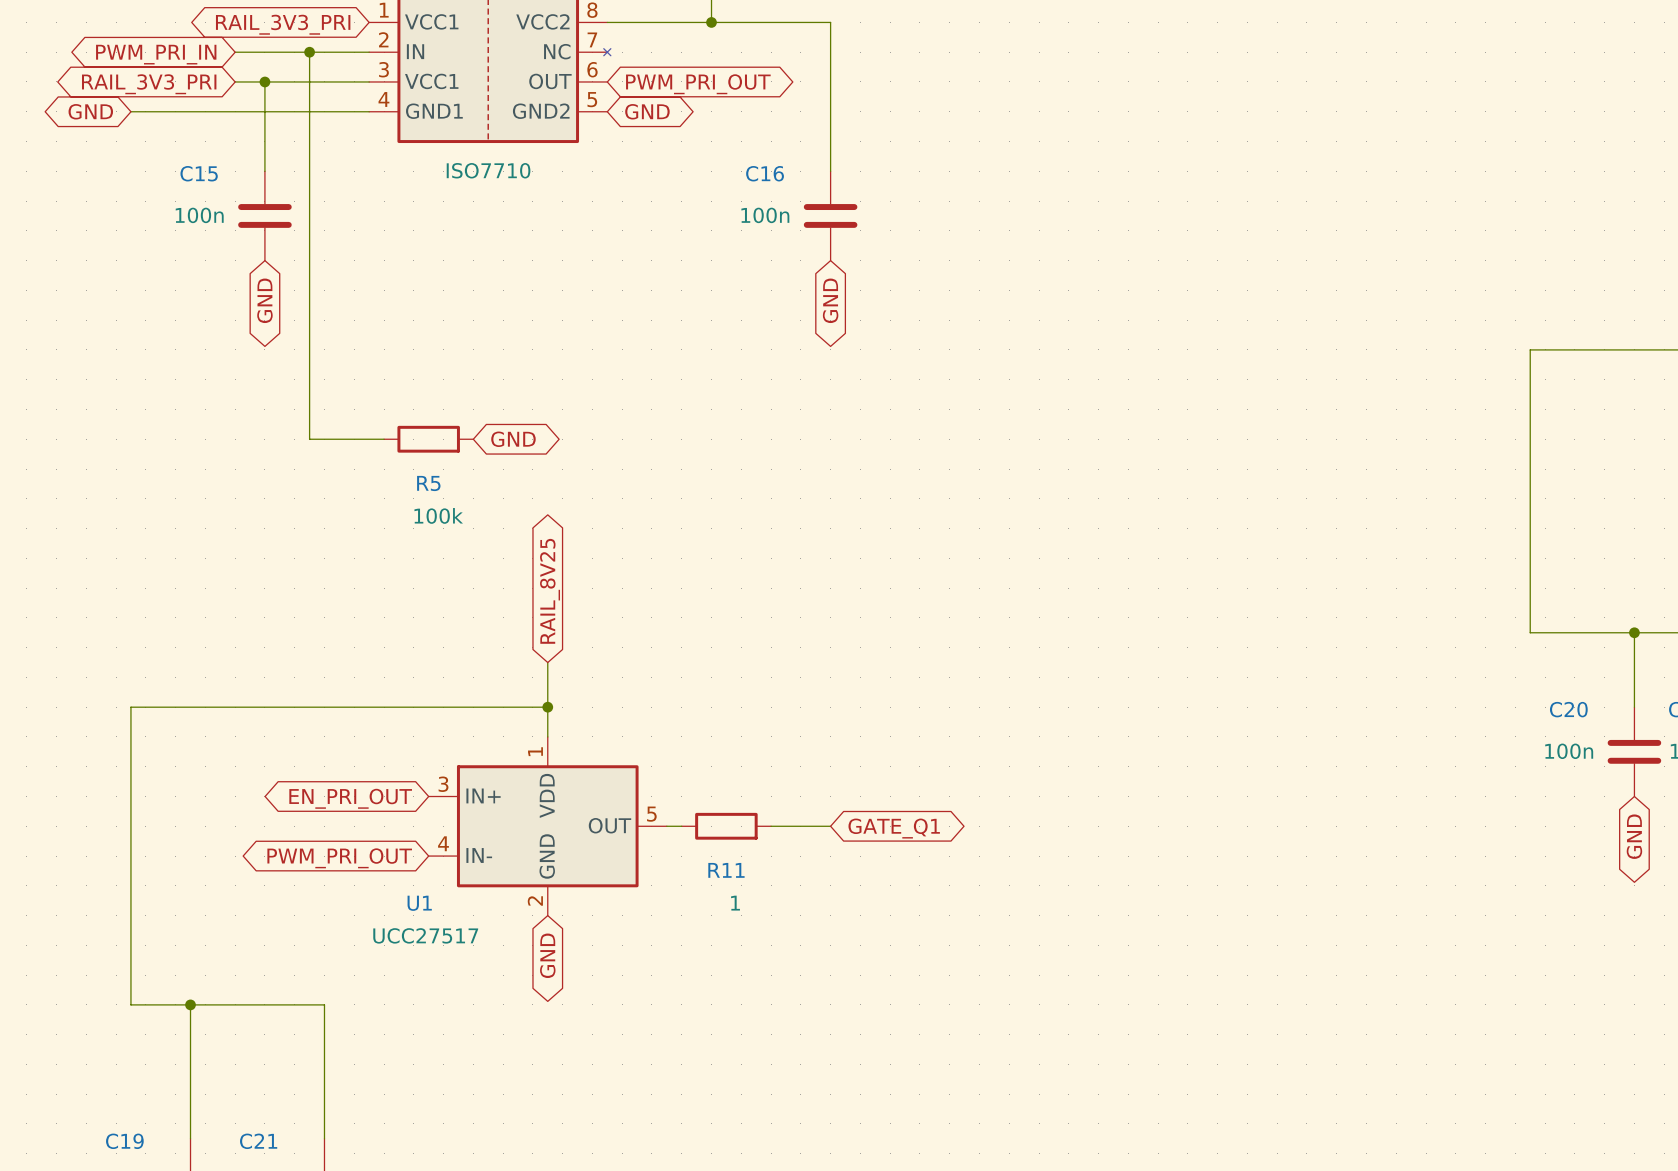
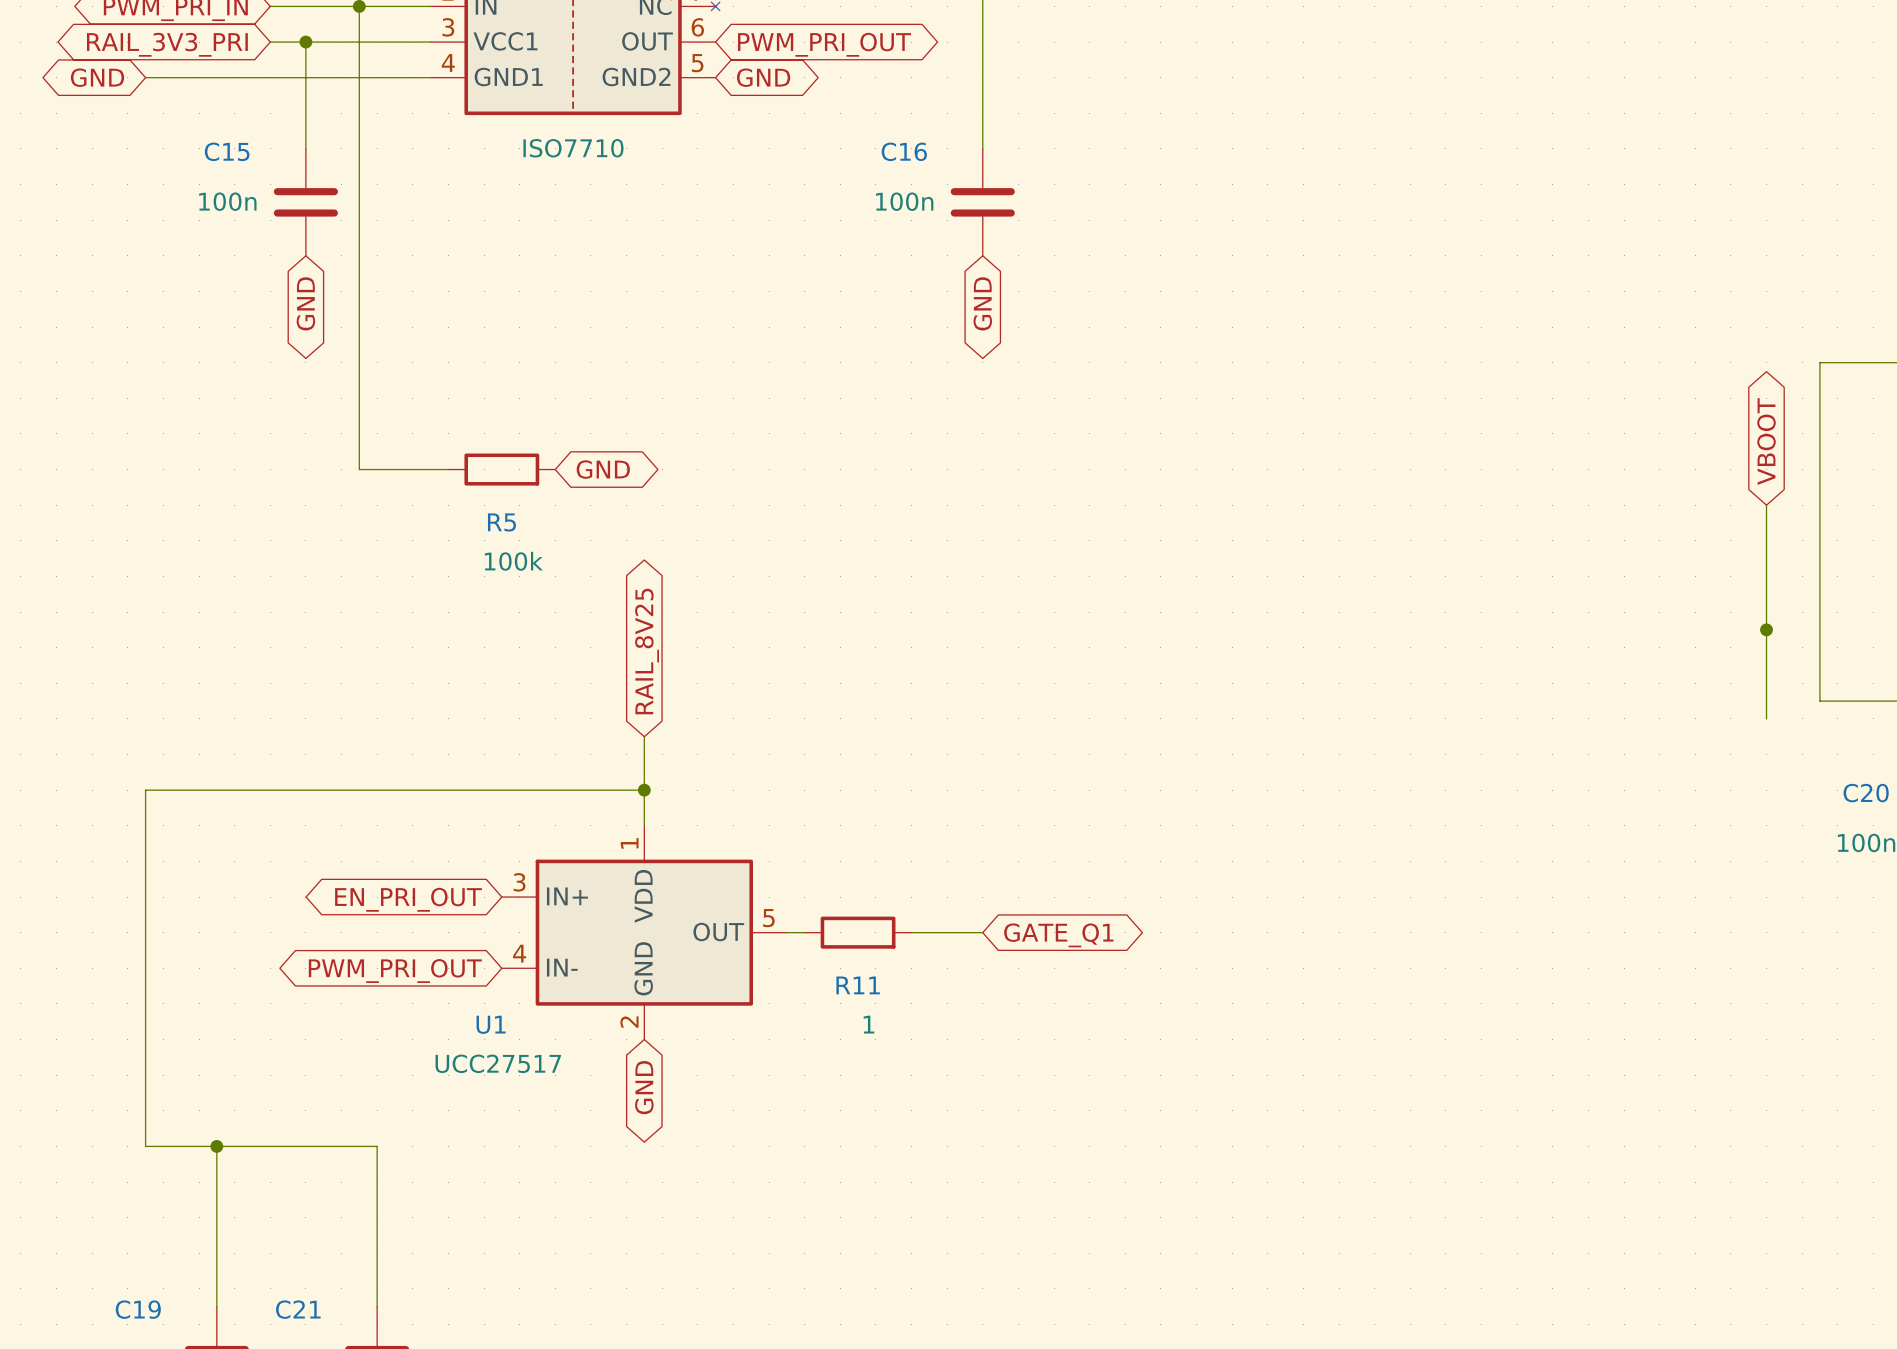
global label: none -> VBOOT (1766, 441)
wire: none -> (1766, 505) (1766, 718)
junction: none -> (1766, 629)

